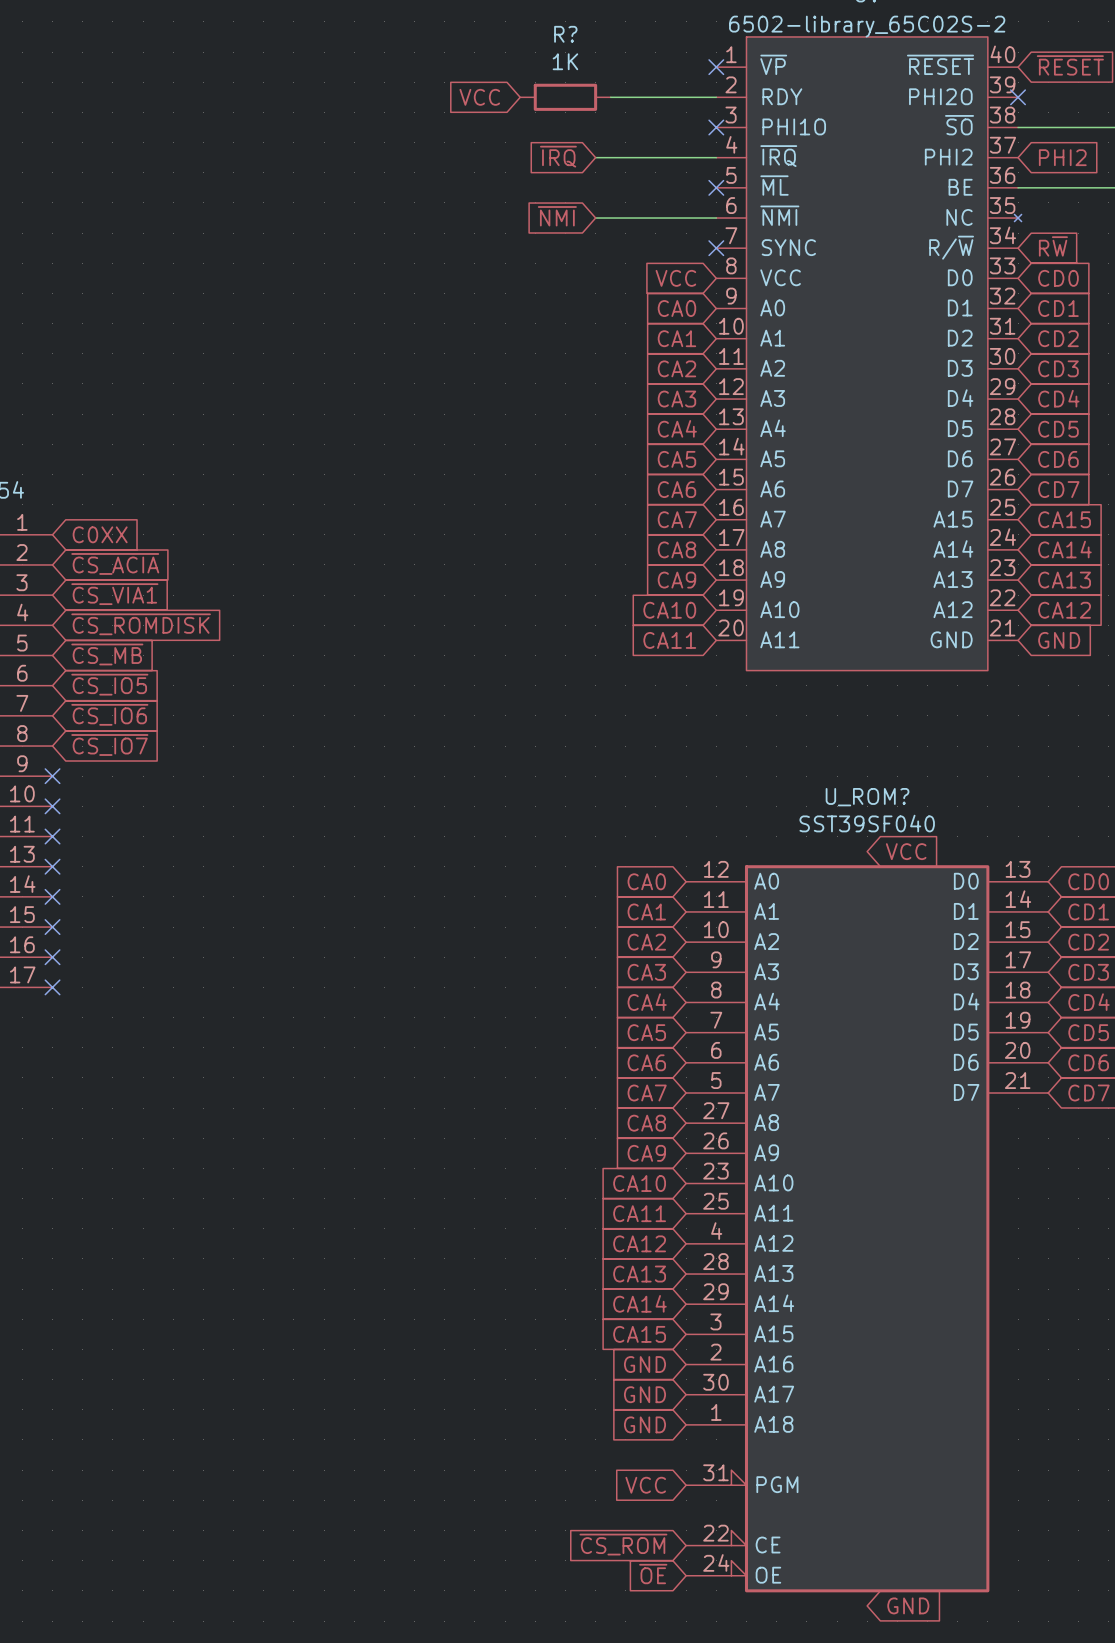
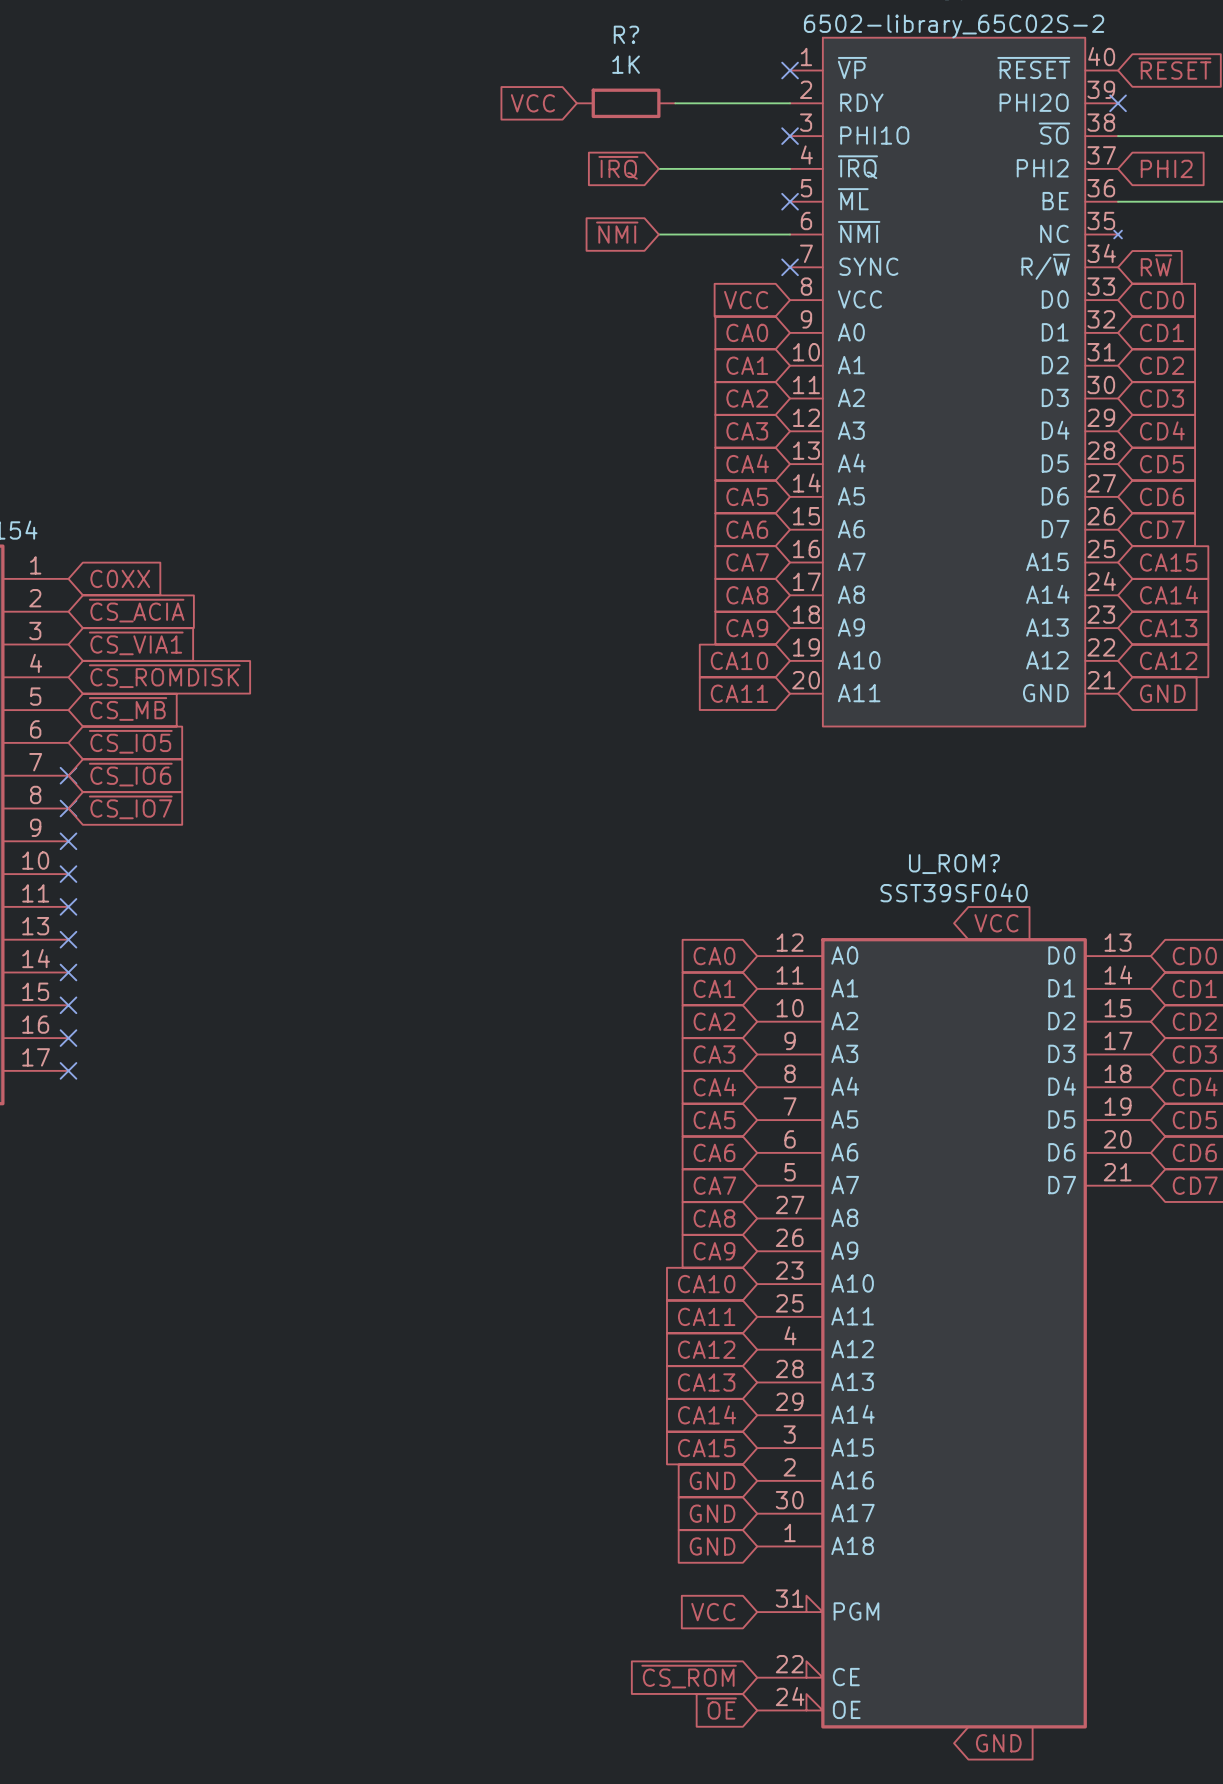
no-connect mark: none -> (68, 775)
no-connect mark: none -> (68, 808)

